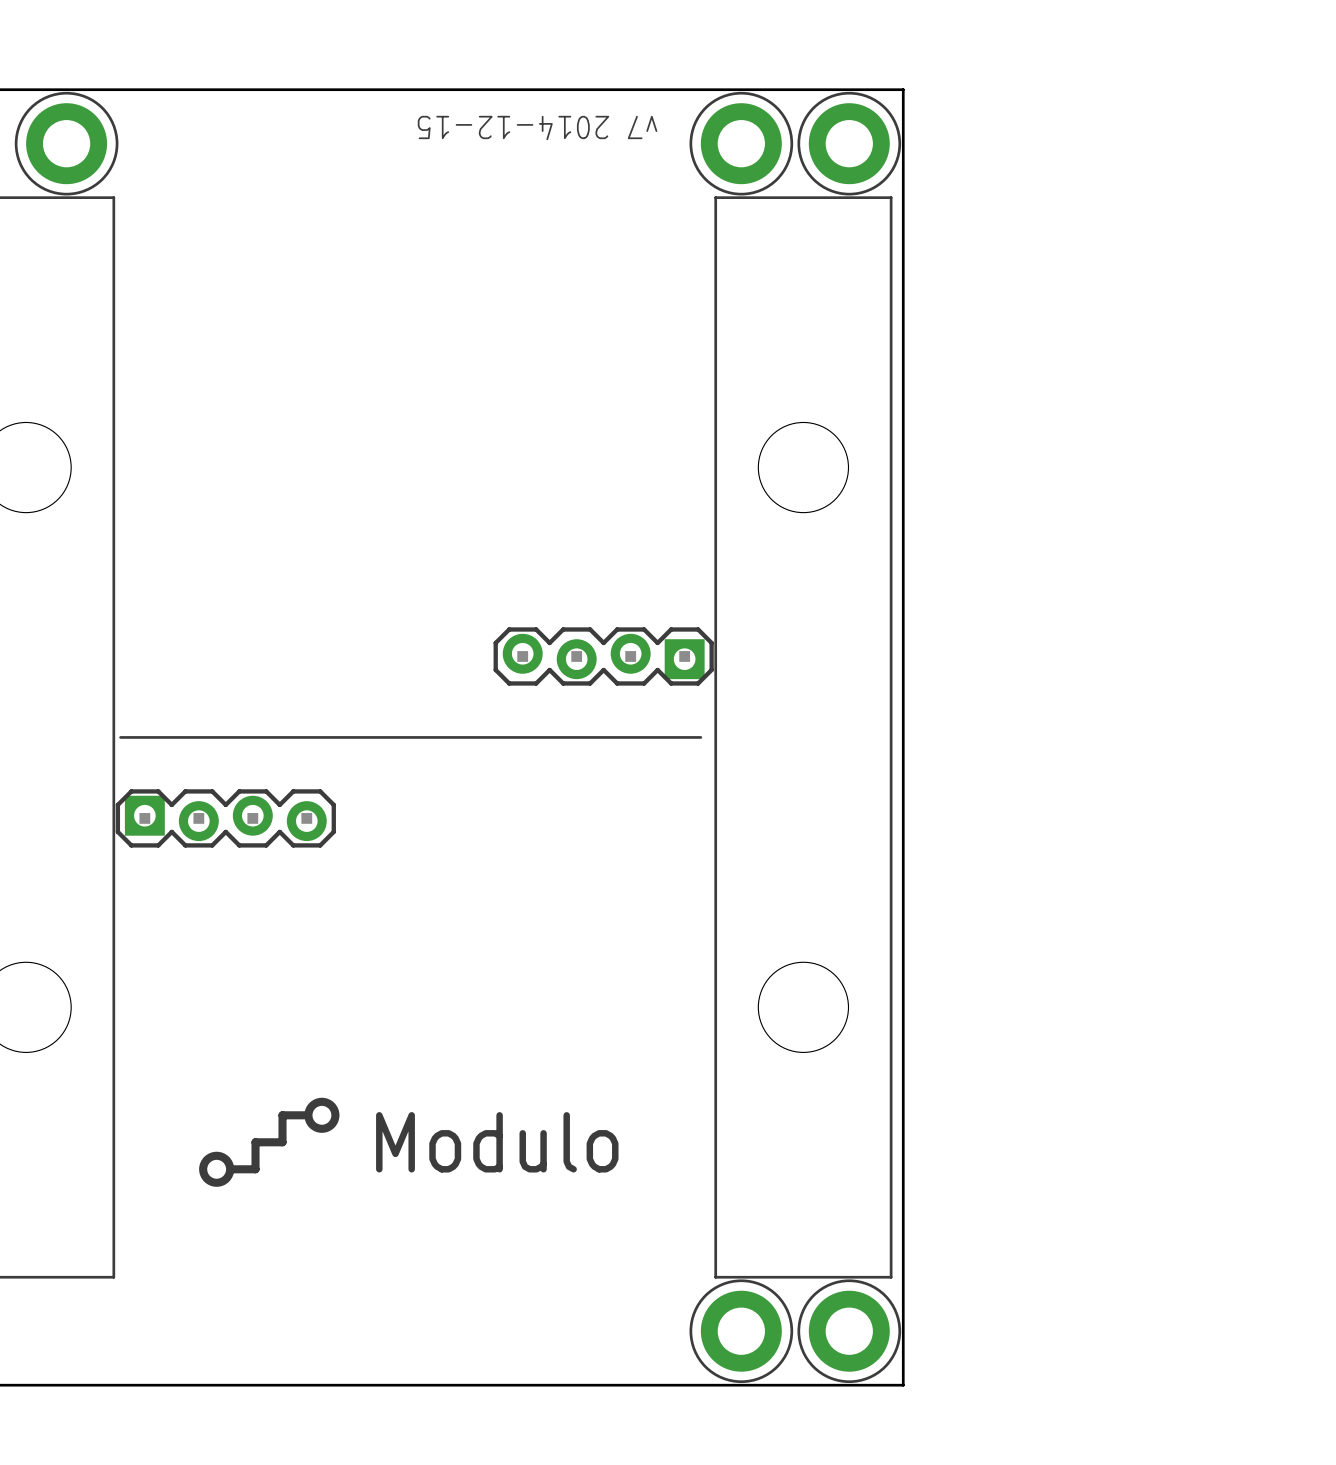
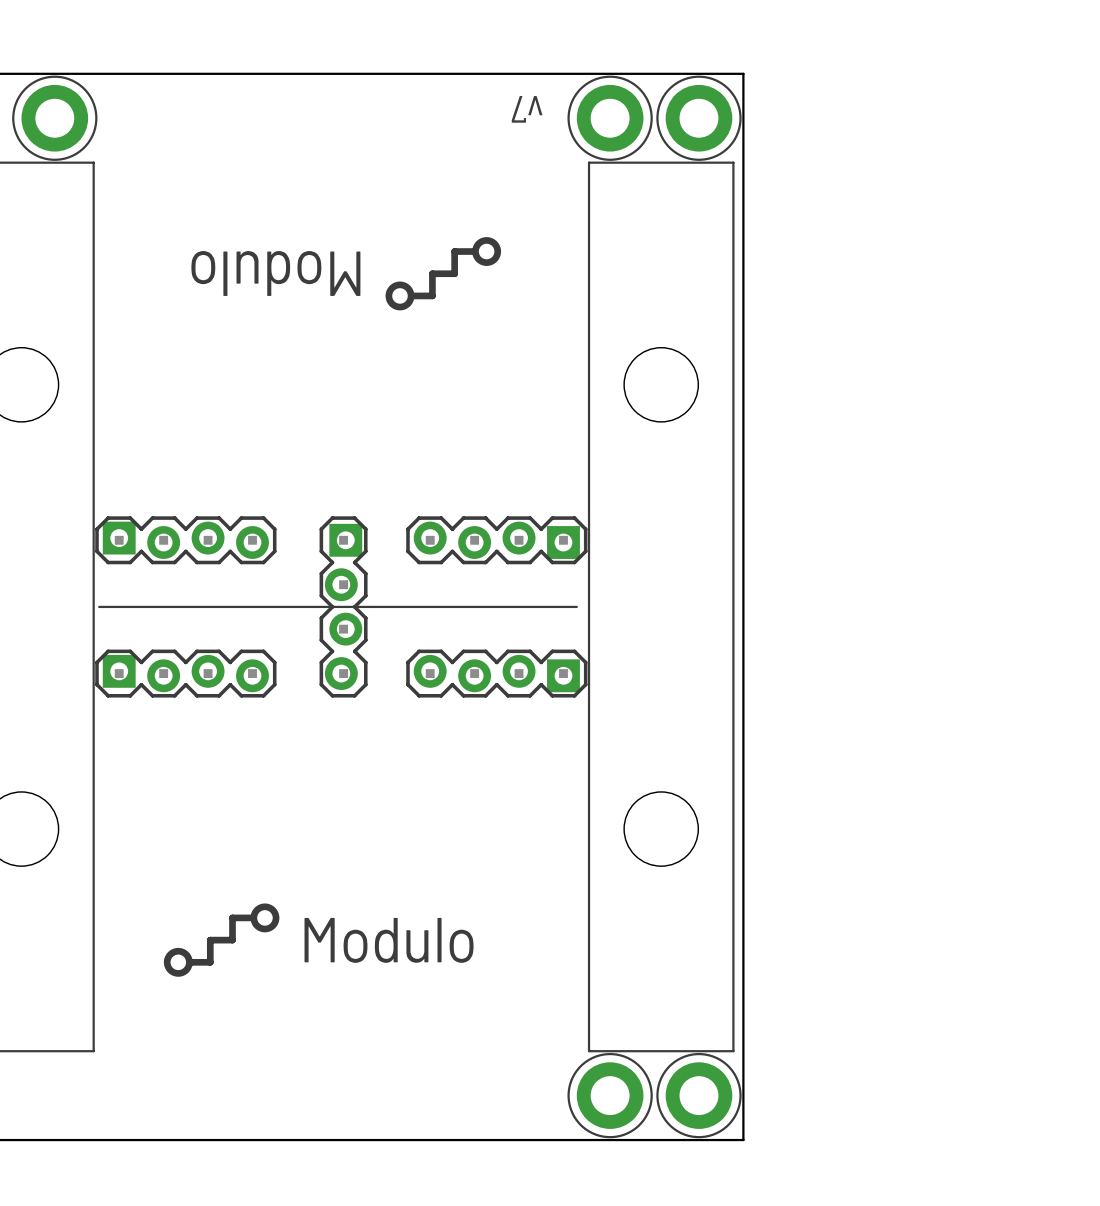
text: v7 2014-12-15 (537, 127) -> v7 (527, 109)
drawing: none -> [472, 237, 502, 266]
line: none -> (472, 251) (454, 251) (454, 273) (432, 273) (432, 295) (414, 295)
text: none -> Modulo (275, 273)
drawing: none -> [385, 281, 415, 311]
part: none -> (185, 540)
part: none -> (343, 606)
part: none -> (496, 673)

